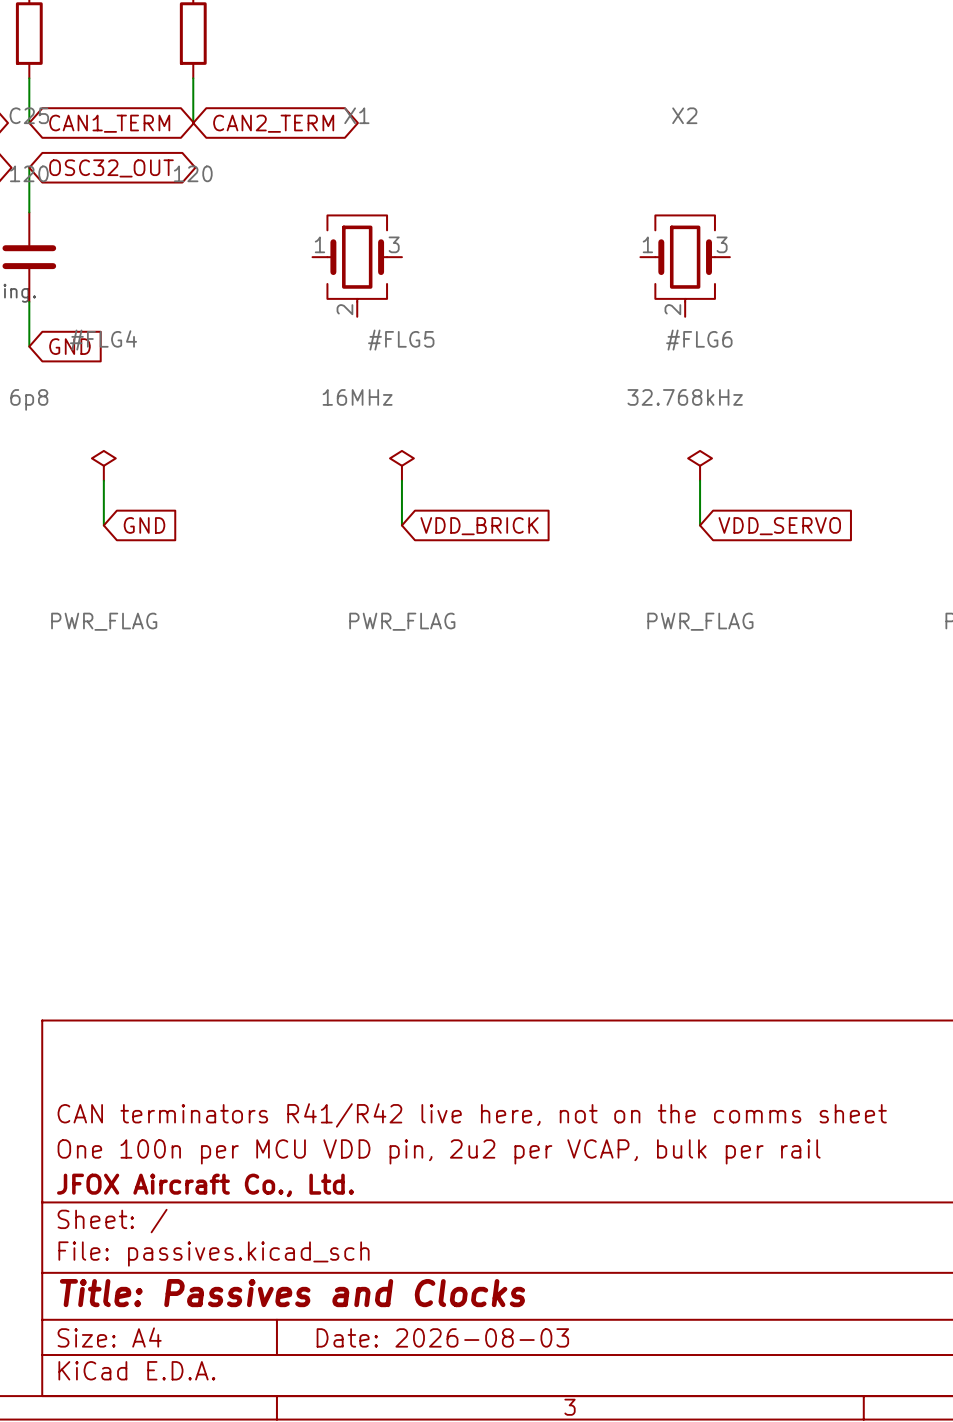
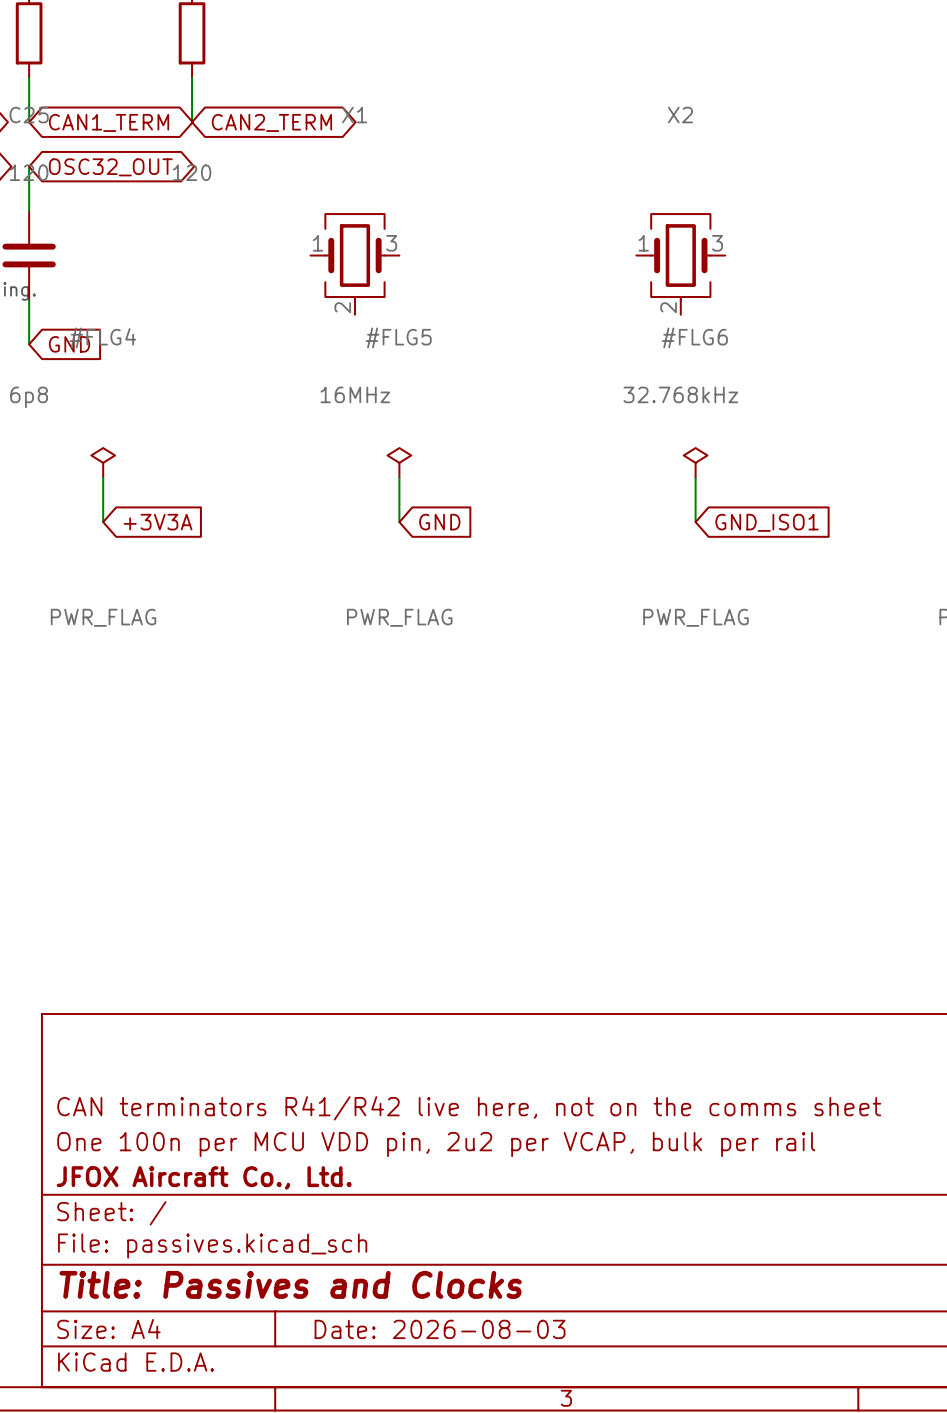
global label: GND (144, 525) -> +3V3A (158, 522)
global label: VDD_BRICK (479, 526) -> GND (439, 522)
global label: VDD_SERVO (779, 526) -> GND_ISO1 (767, 522)

